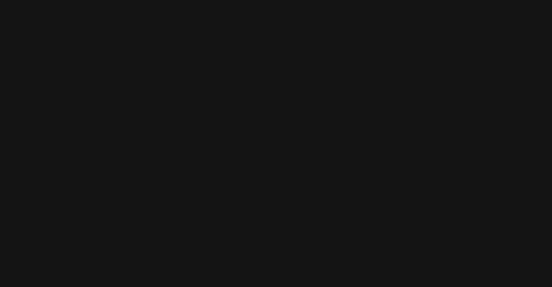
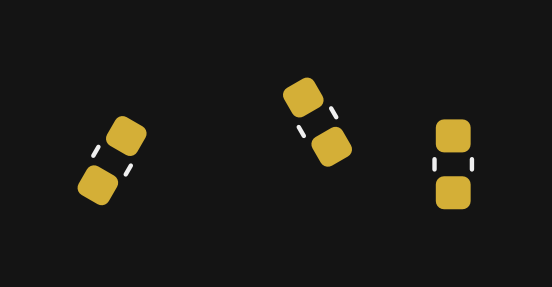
part: none -> (317, 122)
part: none -> (112, 160)
part: none -> (453, 164)

